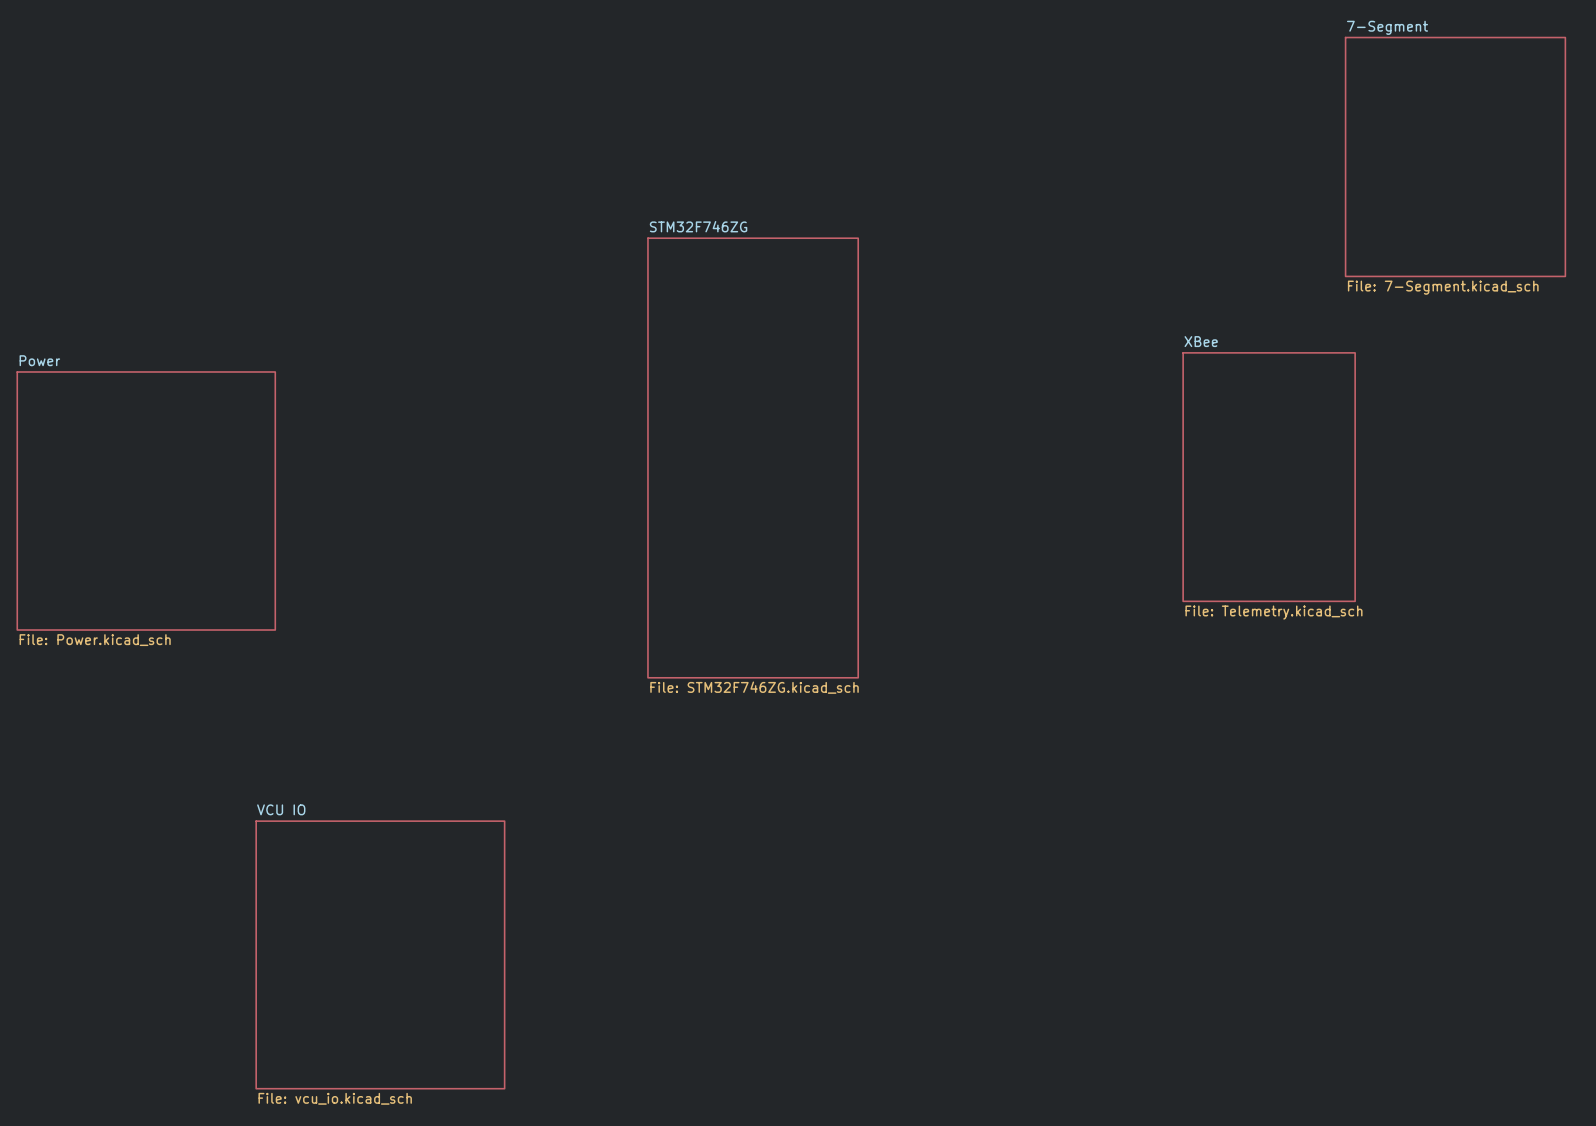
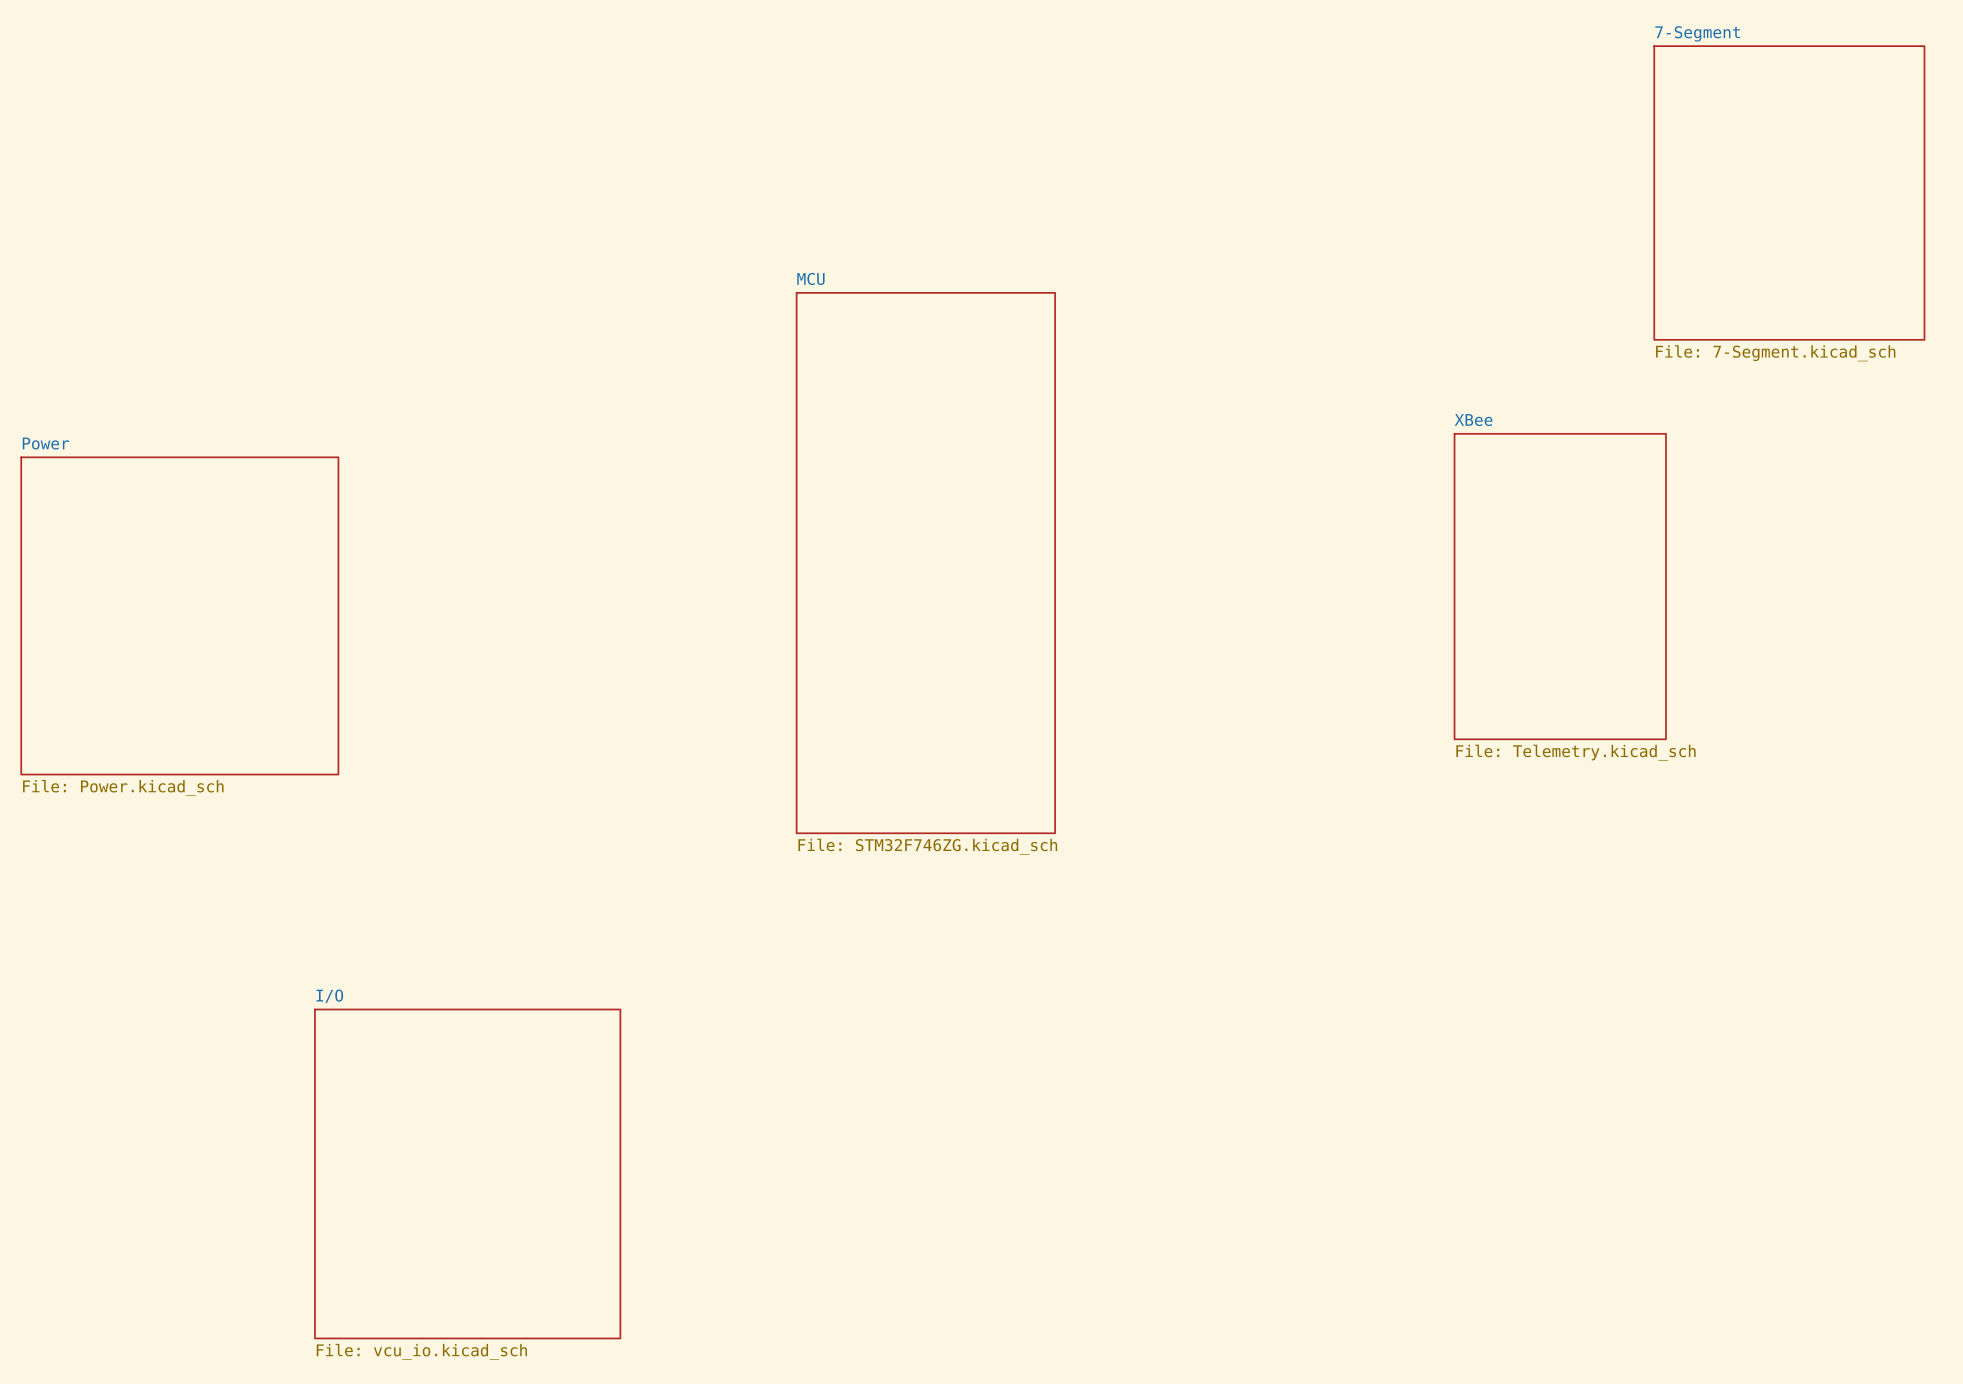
sheet STM32F746ZG name: STM32F746ZG (698, 226) -> MCU (810, 278)
sheet VCU IO name: VCU IO (281, 809) -> I/O (329, 996)

